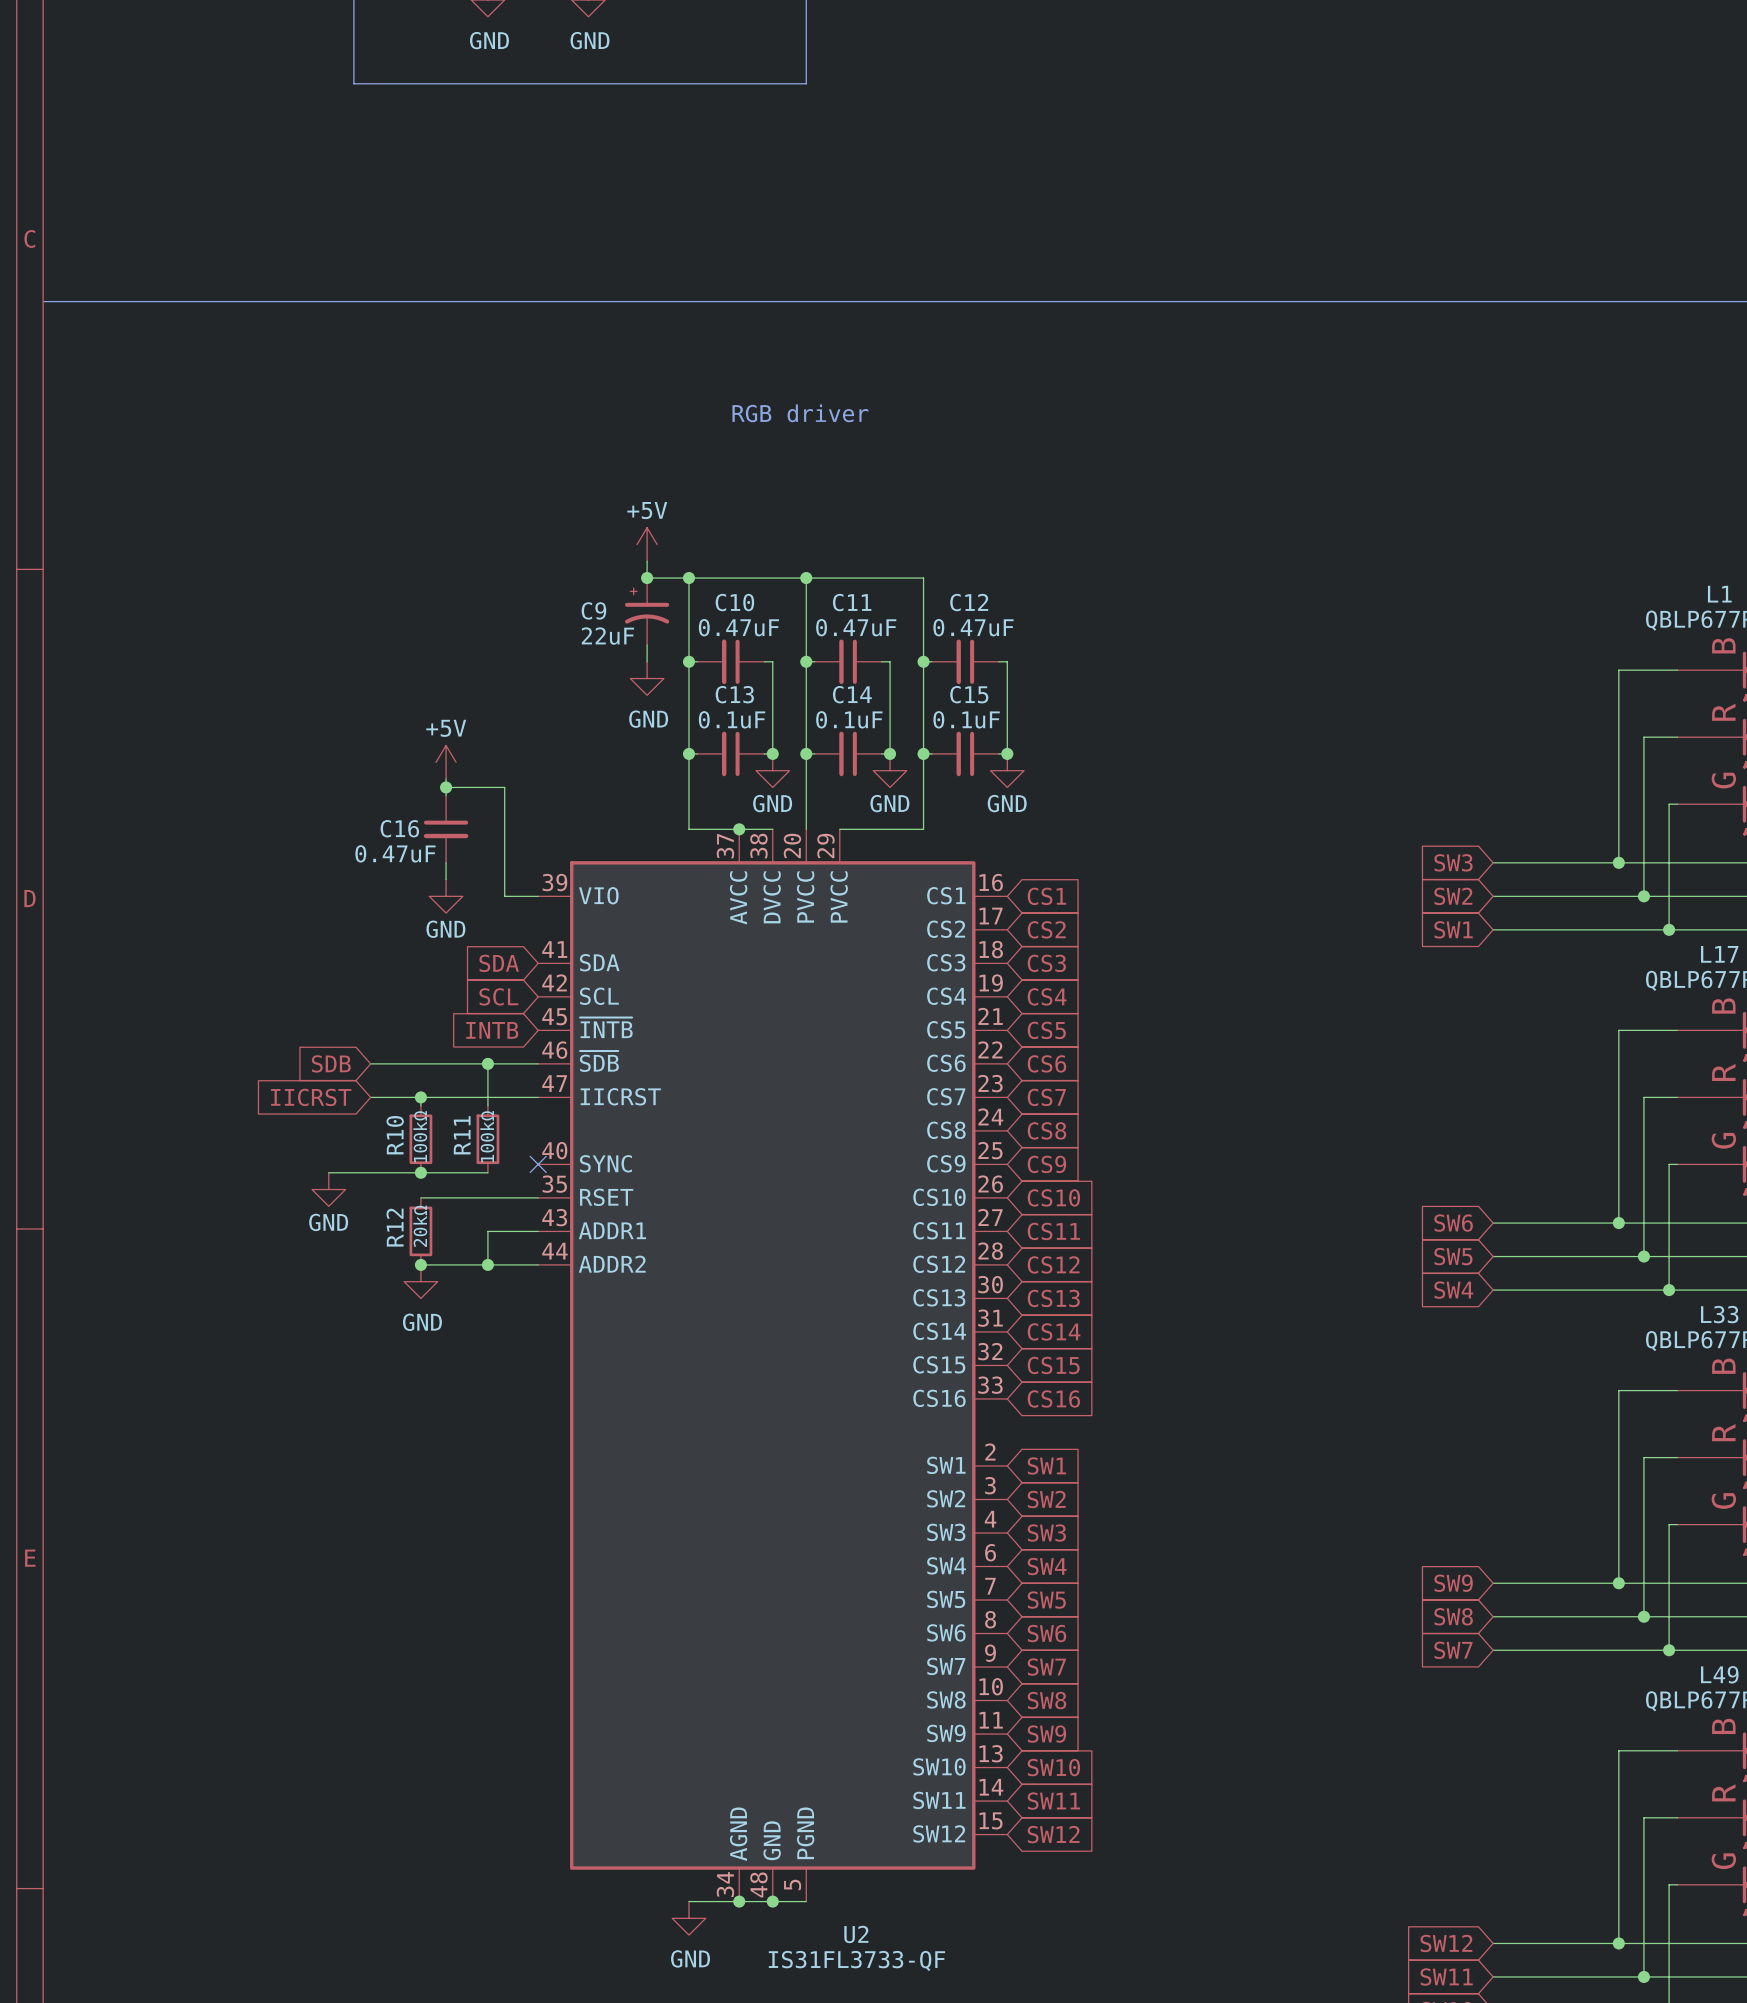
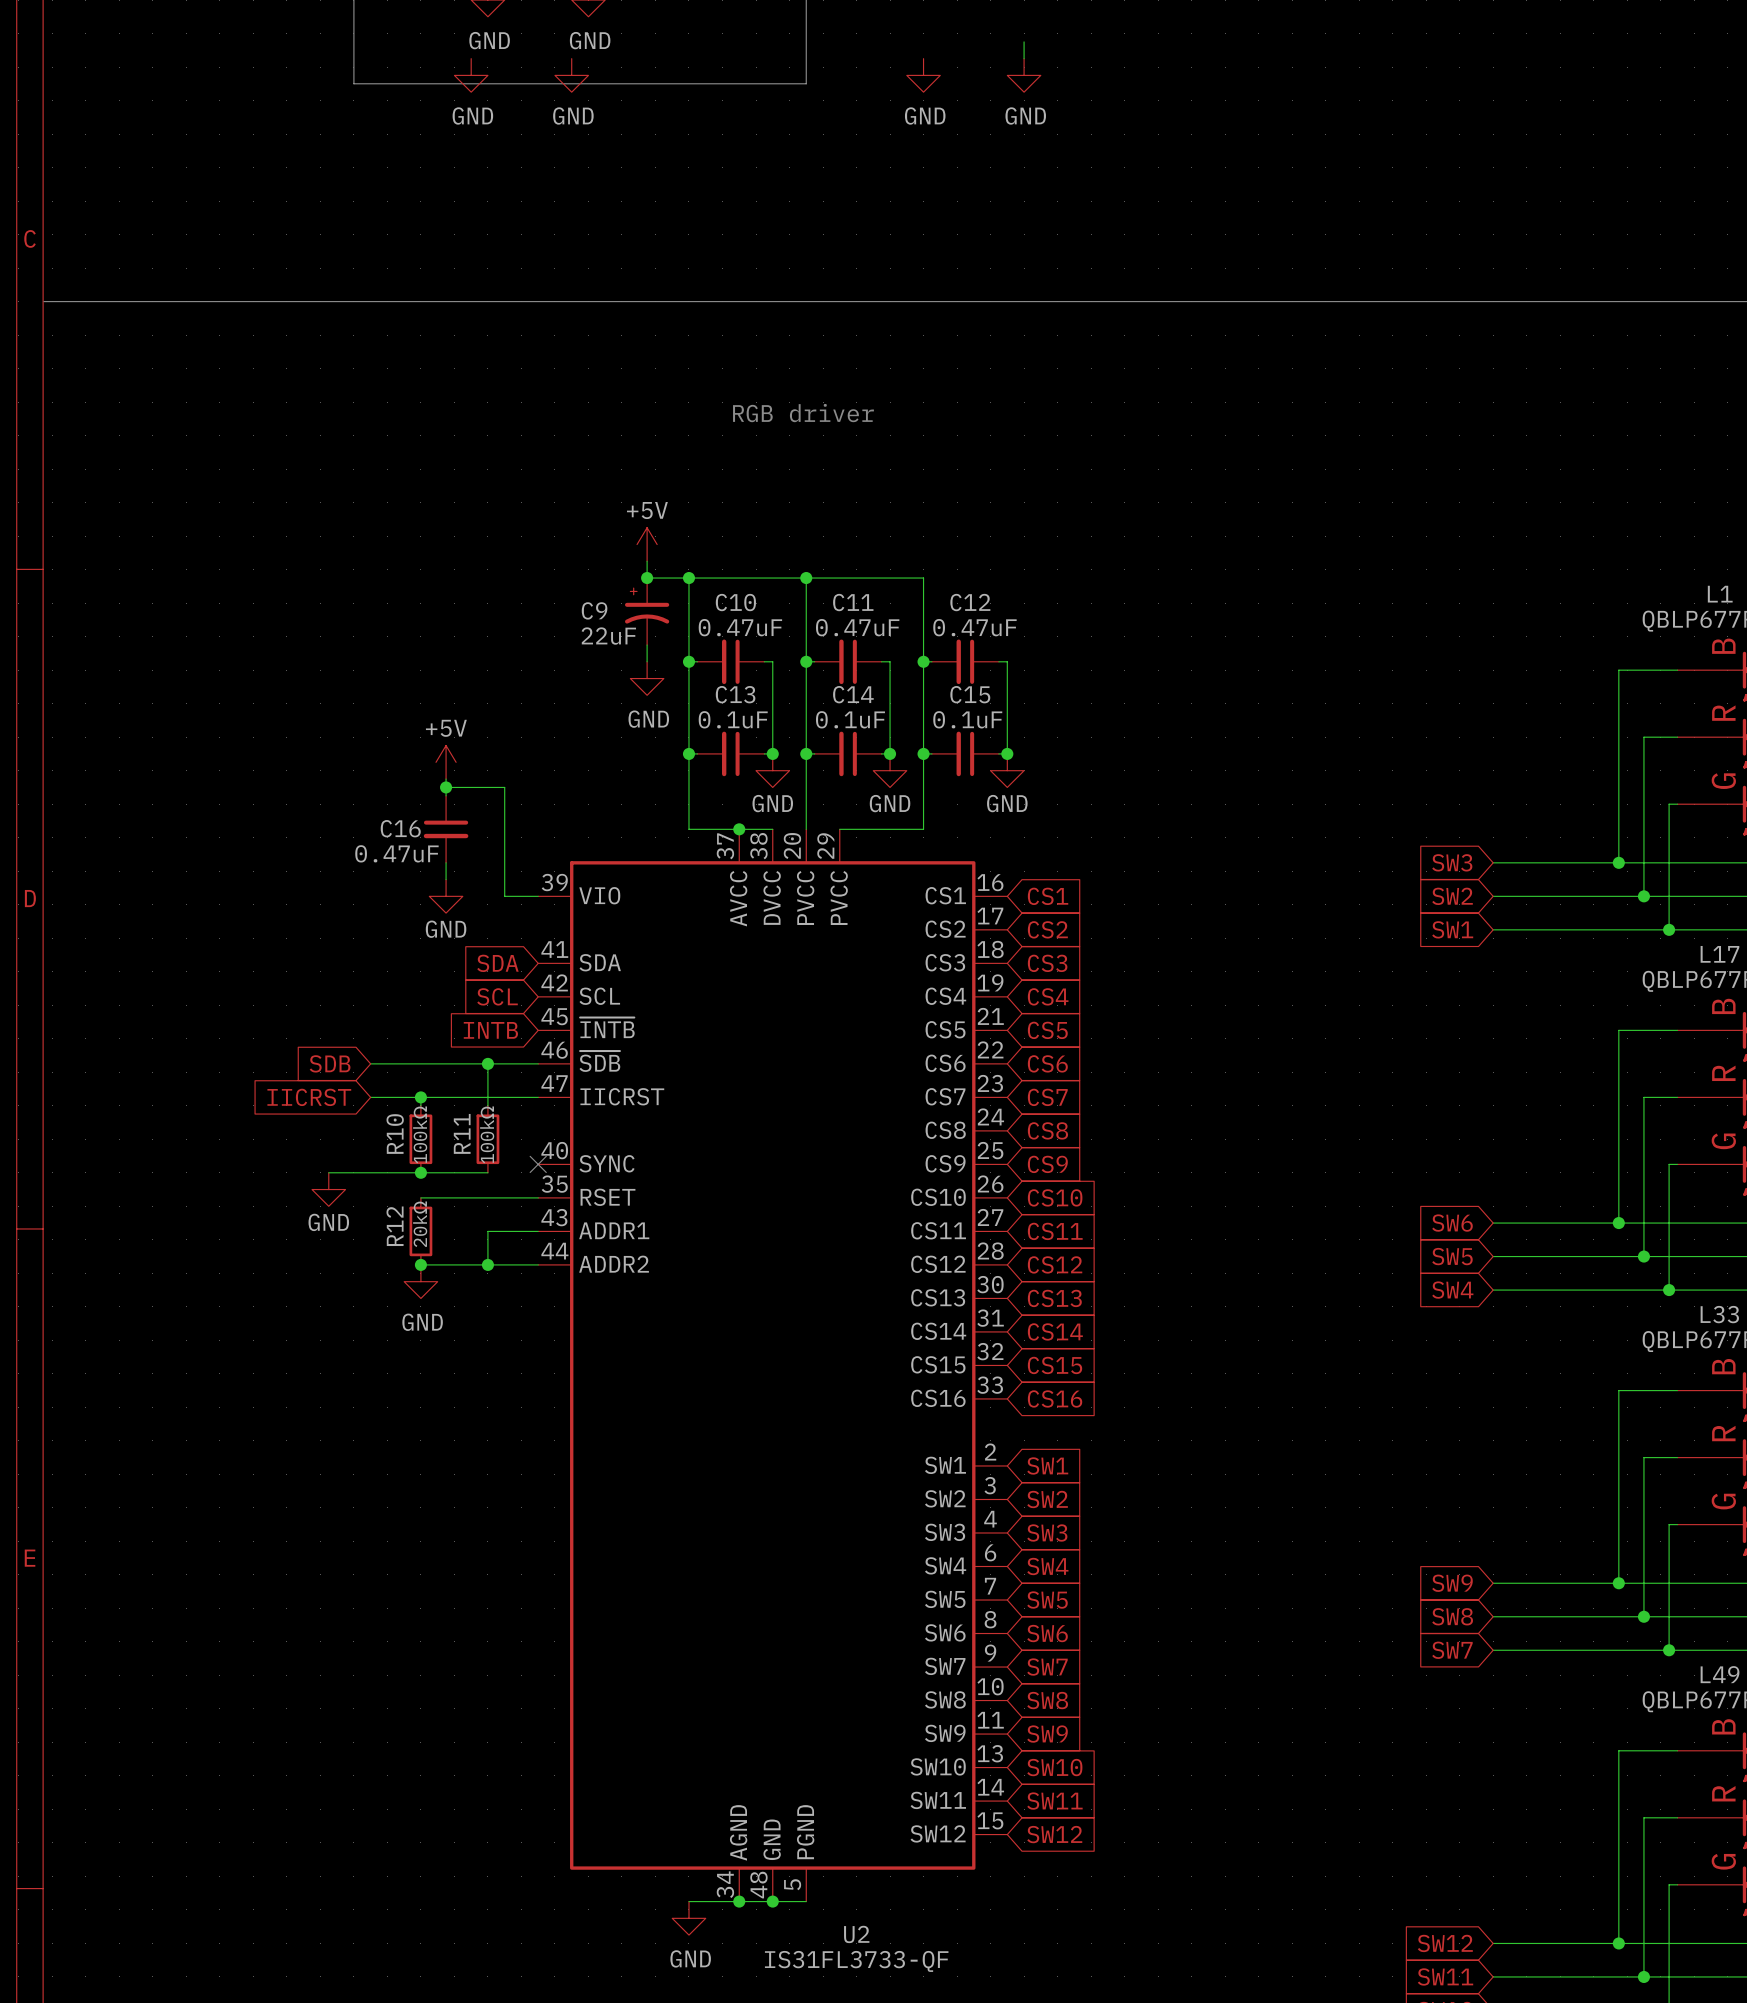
wire: none -> (1024, 41) (1024, 58)
power symbol: none -> GND (471, 75)
power symbol: none -> GND (571, 75)
power symbol: none -> GND (923, 75)
power symbol: none -> GND (1024, 75)

